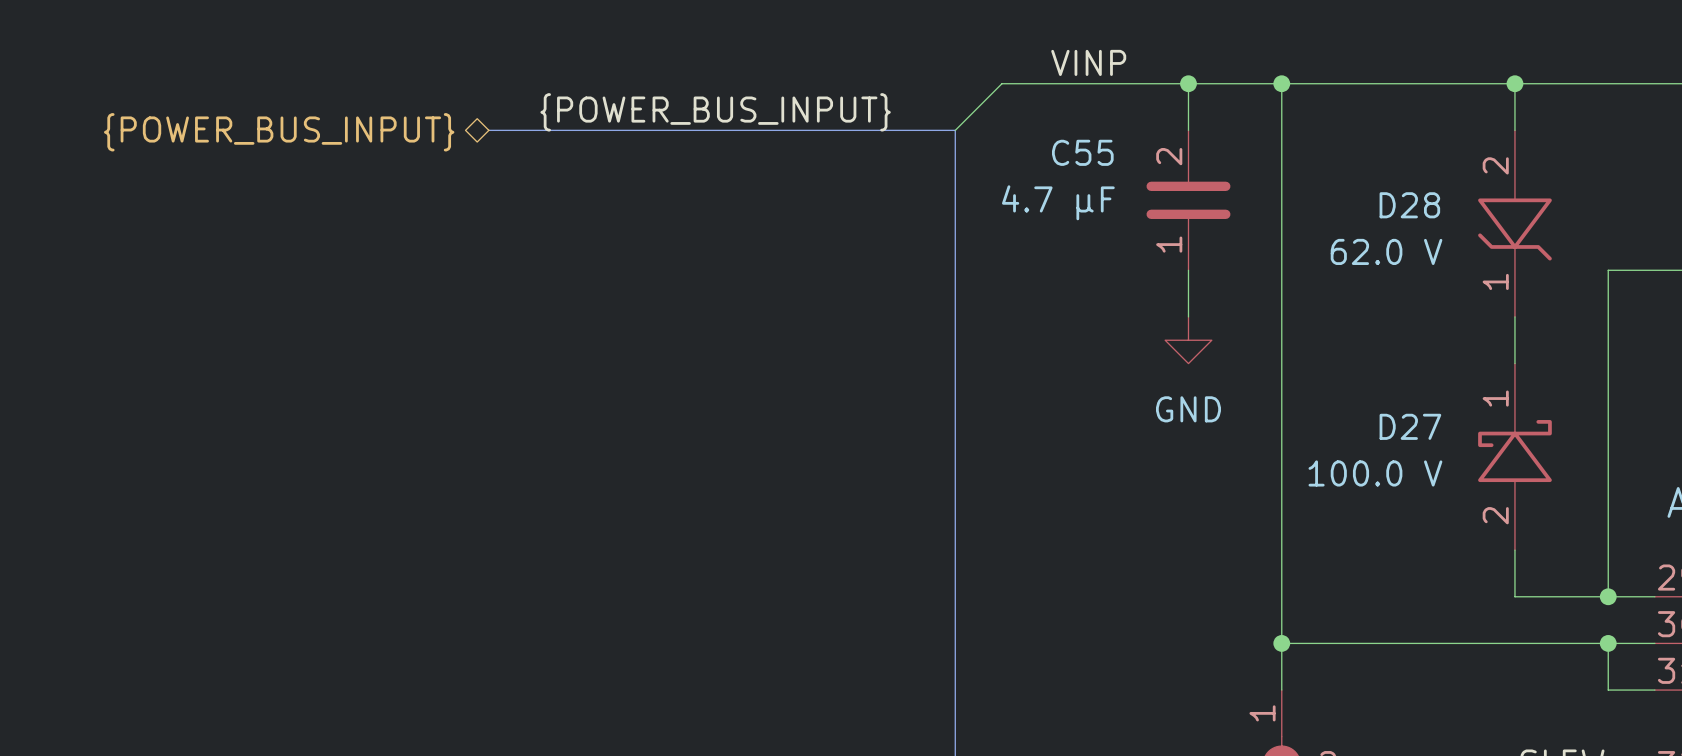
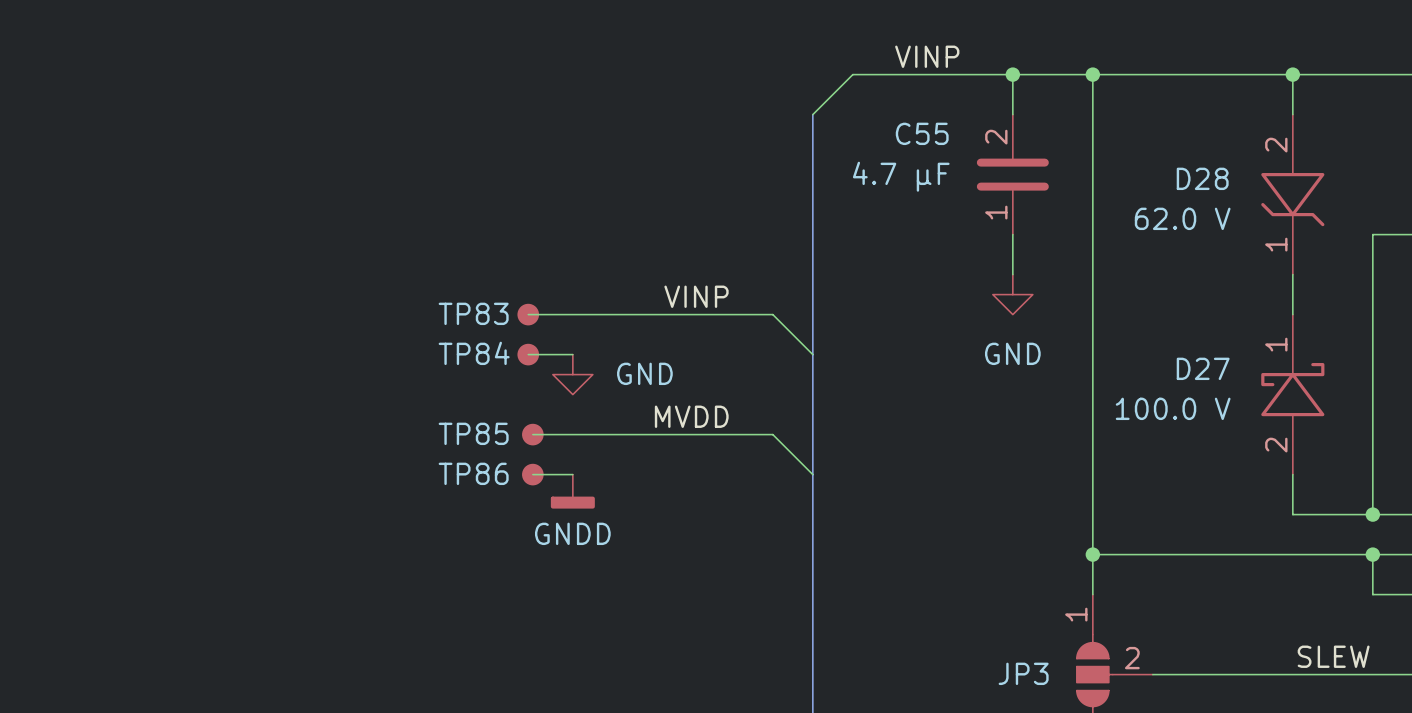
label: {POWER_BUS_INPUT} (715, 112) -> none
bus: (488, 130) (955, 130) -> none
hierarchical label: {POWER_BUS_INPUT} (279, 132) -> none
label: none -> VINP (696, 296)
wire: none -> (528, 314) (772, 314) (812, 354)
TP83: none -> (528, 314)
wire: none -> (528, 354) (572, 354)
TP84: none -> (528, 354)
power symbol: none -> GND (572, 374)
label: none -> MVDD (691, 416)
wire: none -> (532, 434) (772, 434) (812, 474)
TP85: none -> (532, 434)
wire: none -> (532, 474) (572, 474)
TP86: none -> (532, 474)
power symbol: none -> GNDD (572, 491)

